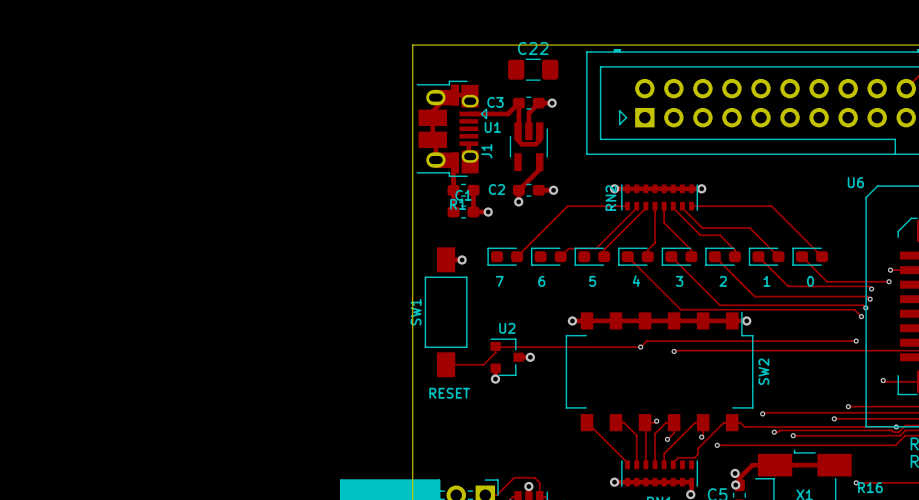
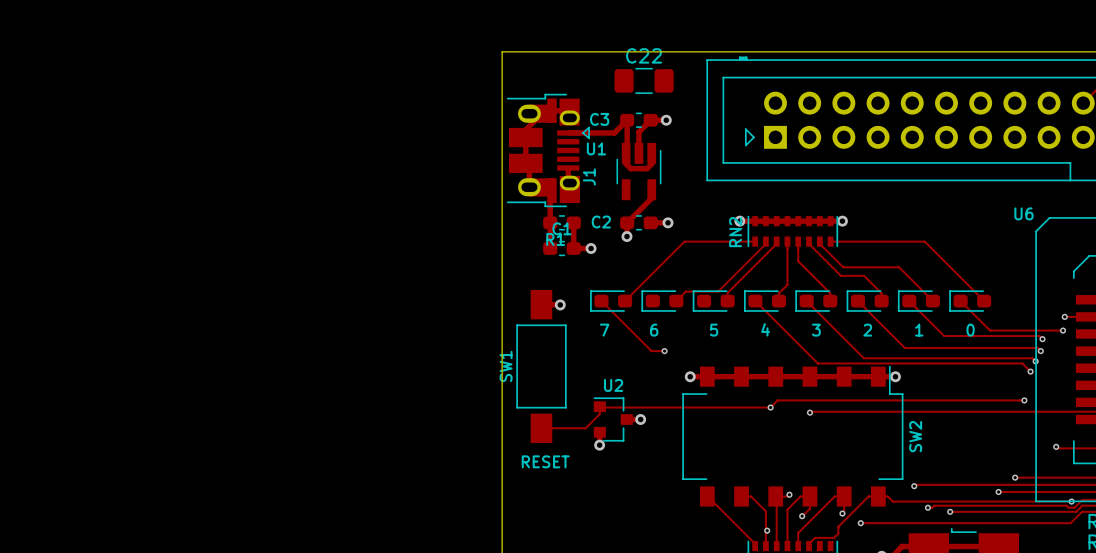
track: none -> (601, 301) (651, 351) (664, 351)
via: none -> (664, 351)
via: none -> (767, 530)

